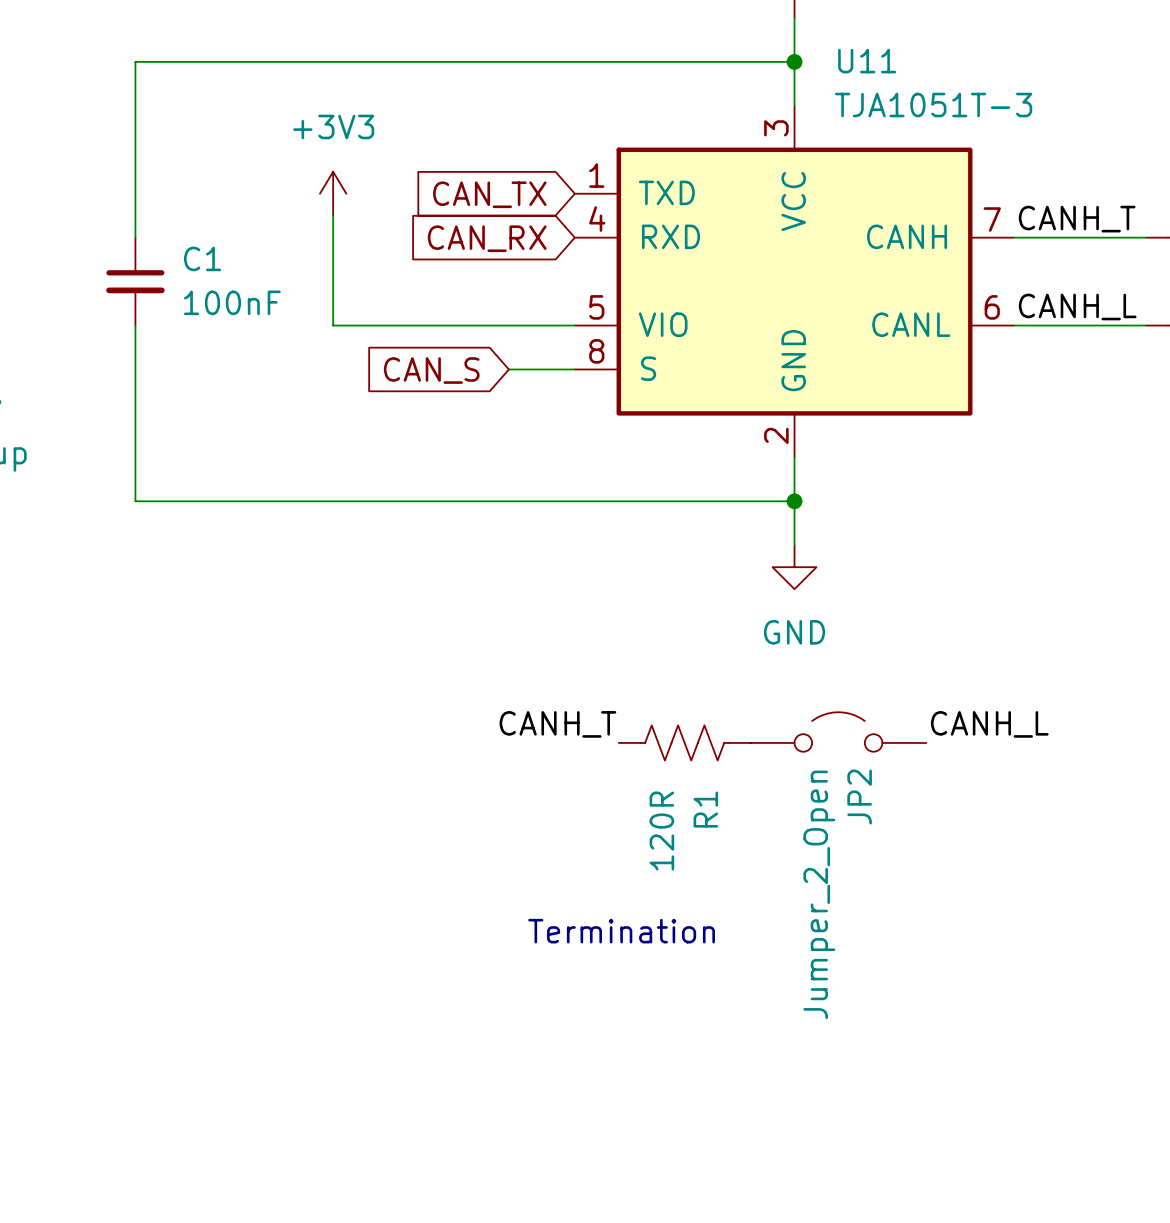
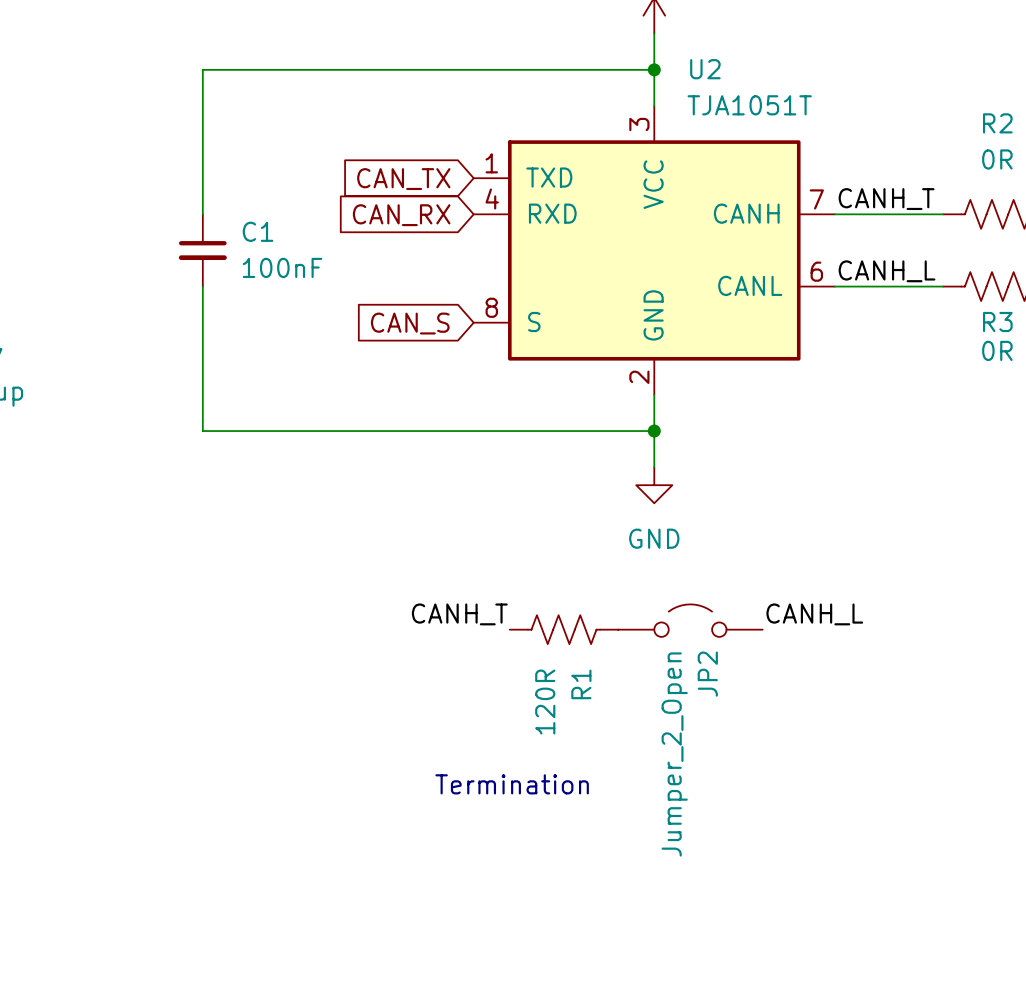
wire: (245, 61) (135, 61) (135, 237) -> (202, 69) (202, 214)
power symbol: +3V3 (333, 193) -> none
wire: (333, 215) (333, 325) (574, 325) -> none
C1 position: (135, 281) -> (202, 250)
U11: TJA1051T-3 (794, 281) -> none
U2: none -> TJA1051T (654, 250)
wire: (135, 325) (135, 501) (245, 501) -> (202, 286) (202, 431)
wire: (508, 369) (574, 369) -> none
global label position: CAN_S (431, 370) -> CAN_S (410, 323)

